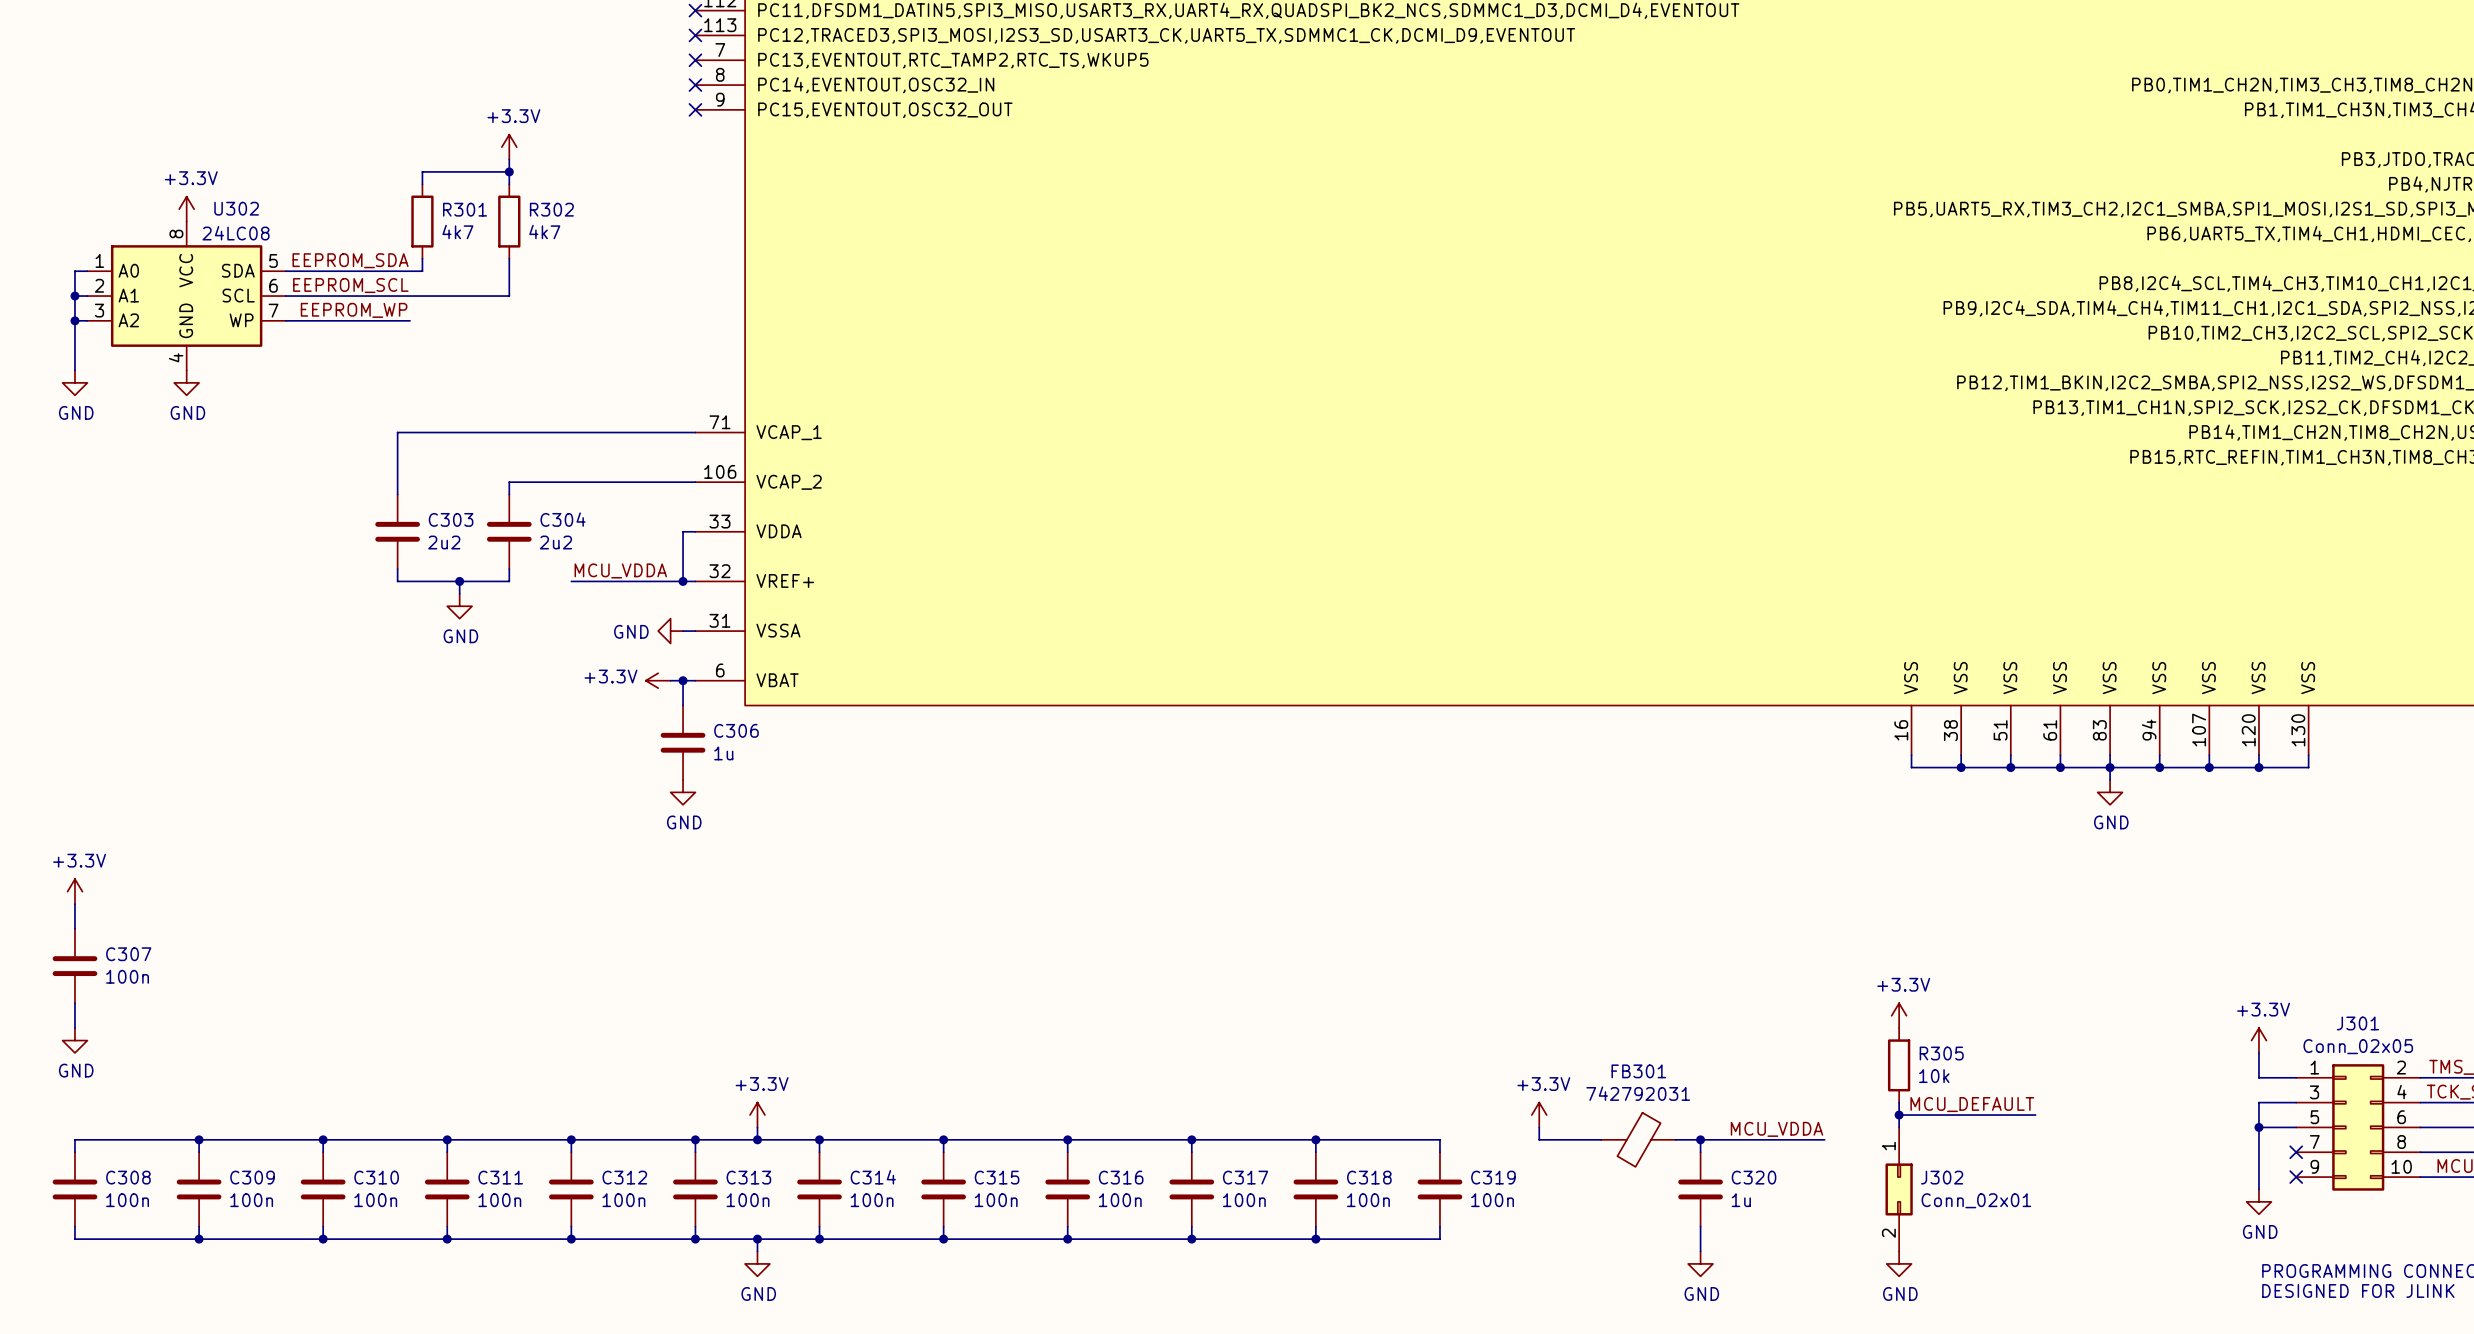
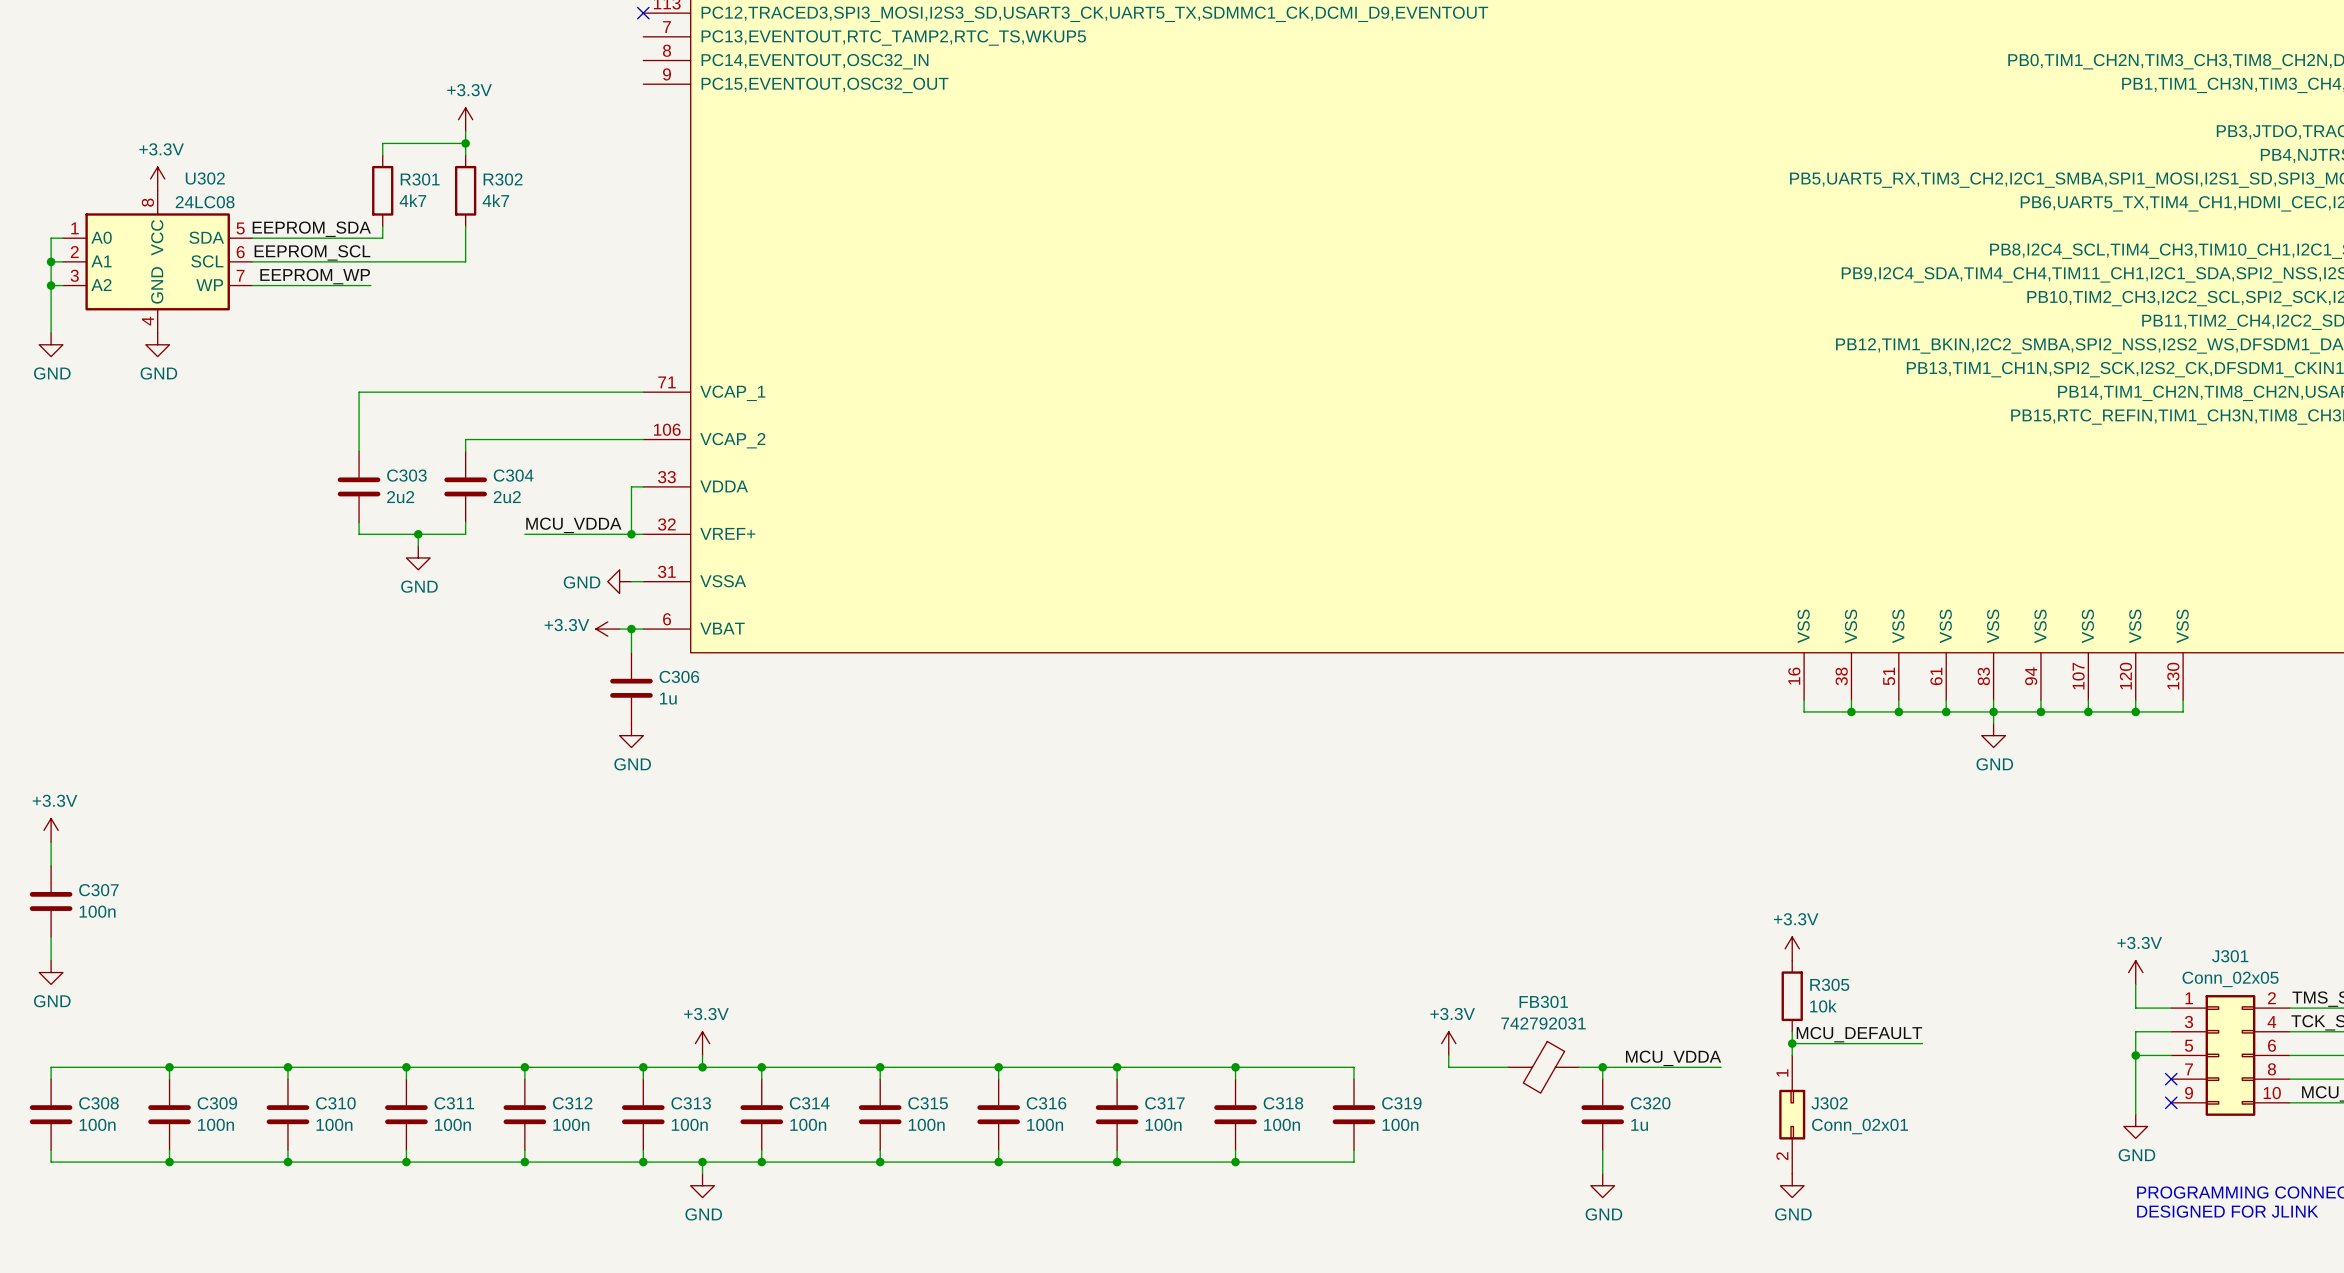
no-connect mark: (695, 60) -> none
no-connect mark: (695, 85) -> none
no-connect mark: (695, 109) -> none

